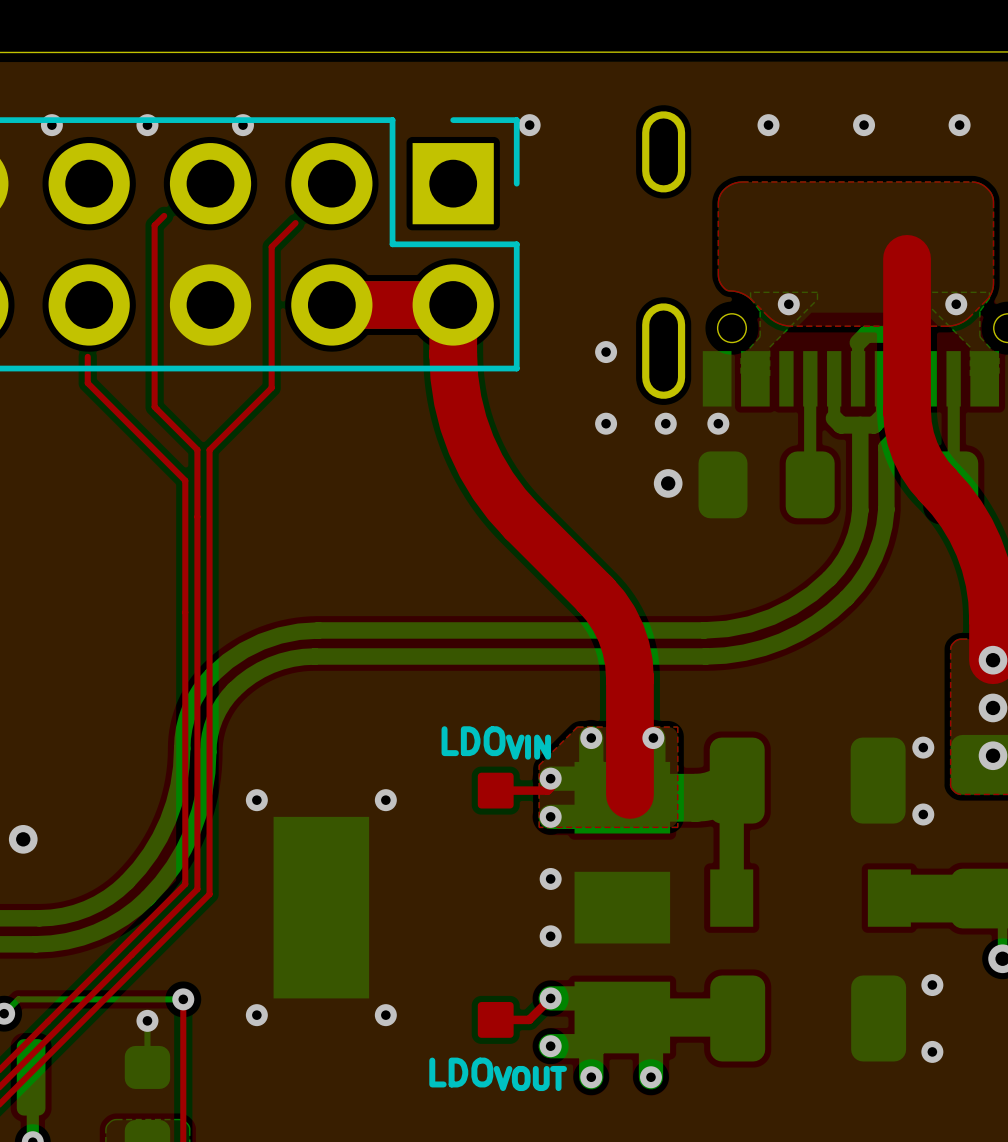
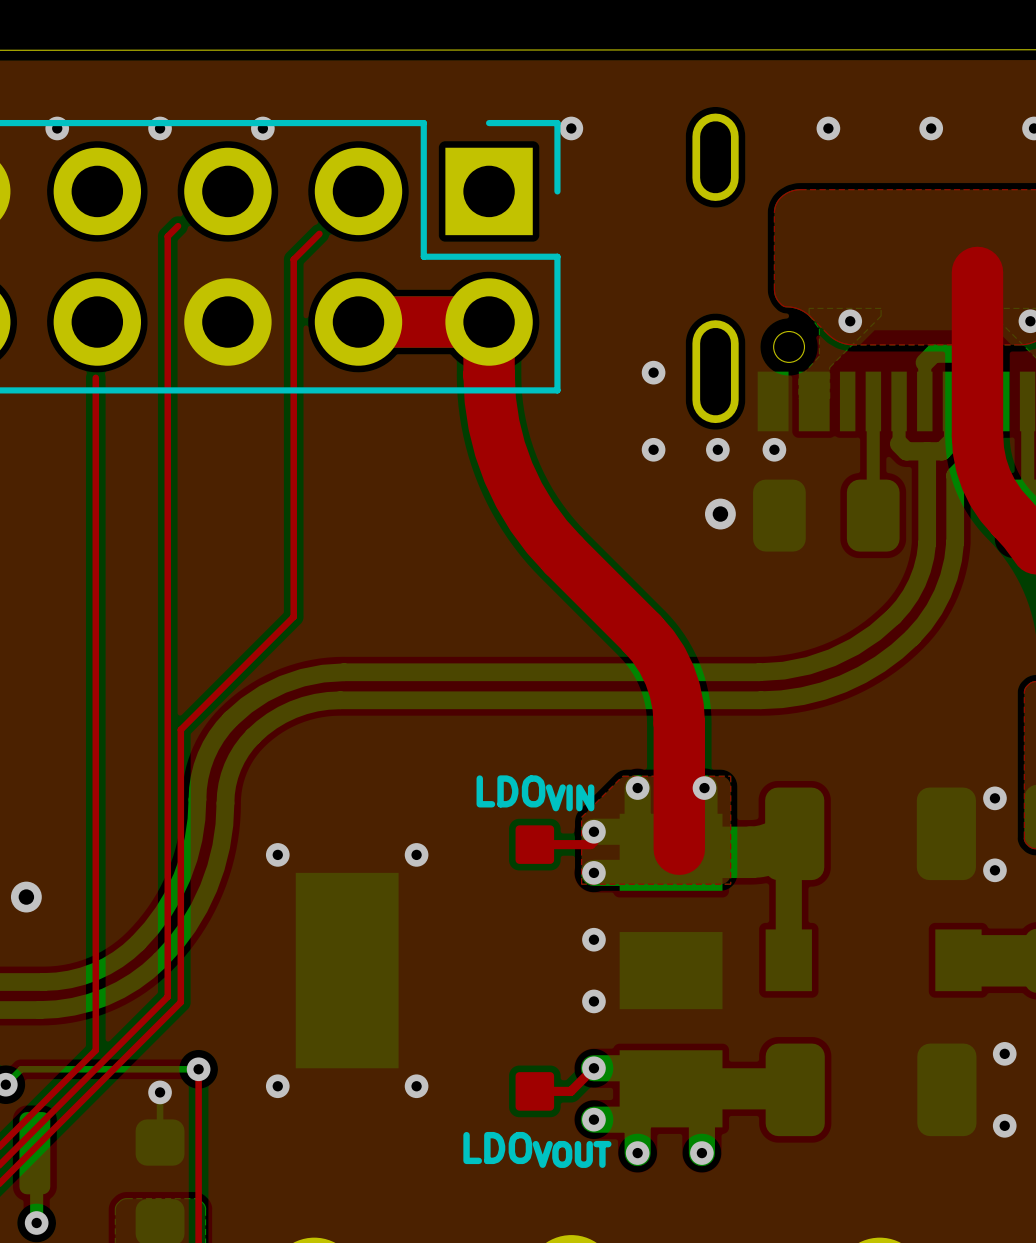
top track: (87, 383) (185, 480) (185, 884) (87, 981) -> (95, 406) (95, 1050)
top track: (271, 387) (209, 449) (209, 894) (166, 937) -> (293, 411) (293, 616) (180, 729) (180, 1002)
top track: (154, 406) (197, 449) (197, 889) (154, 932) -> (167, 431) (167, 996)

